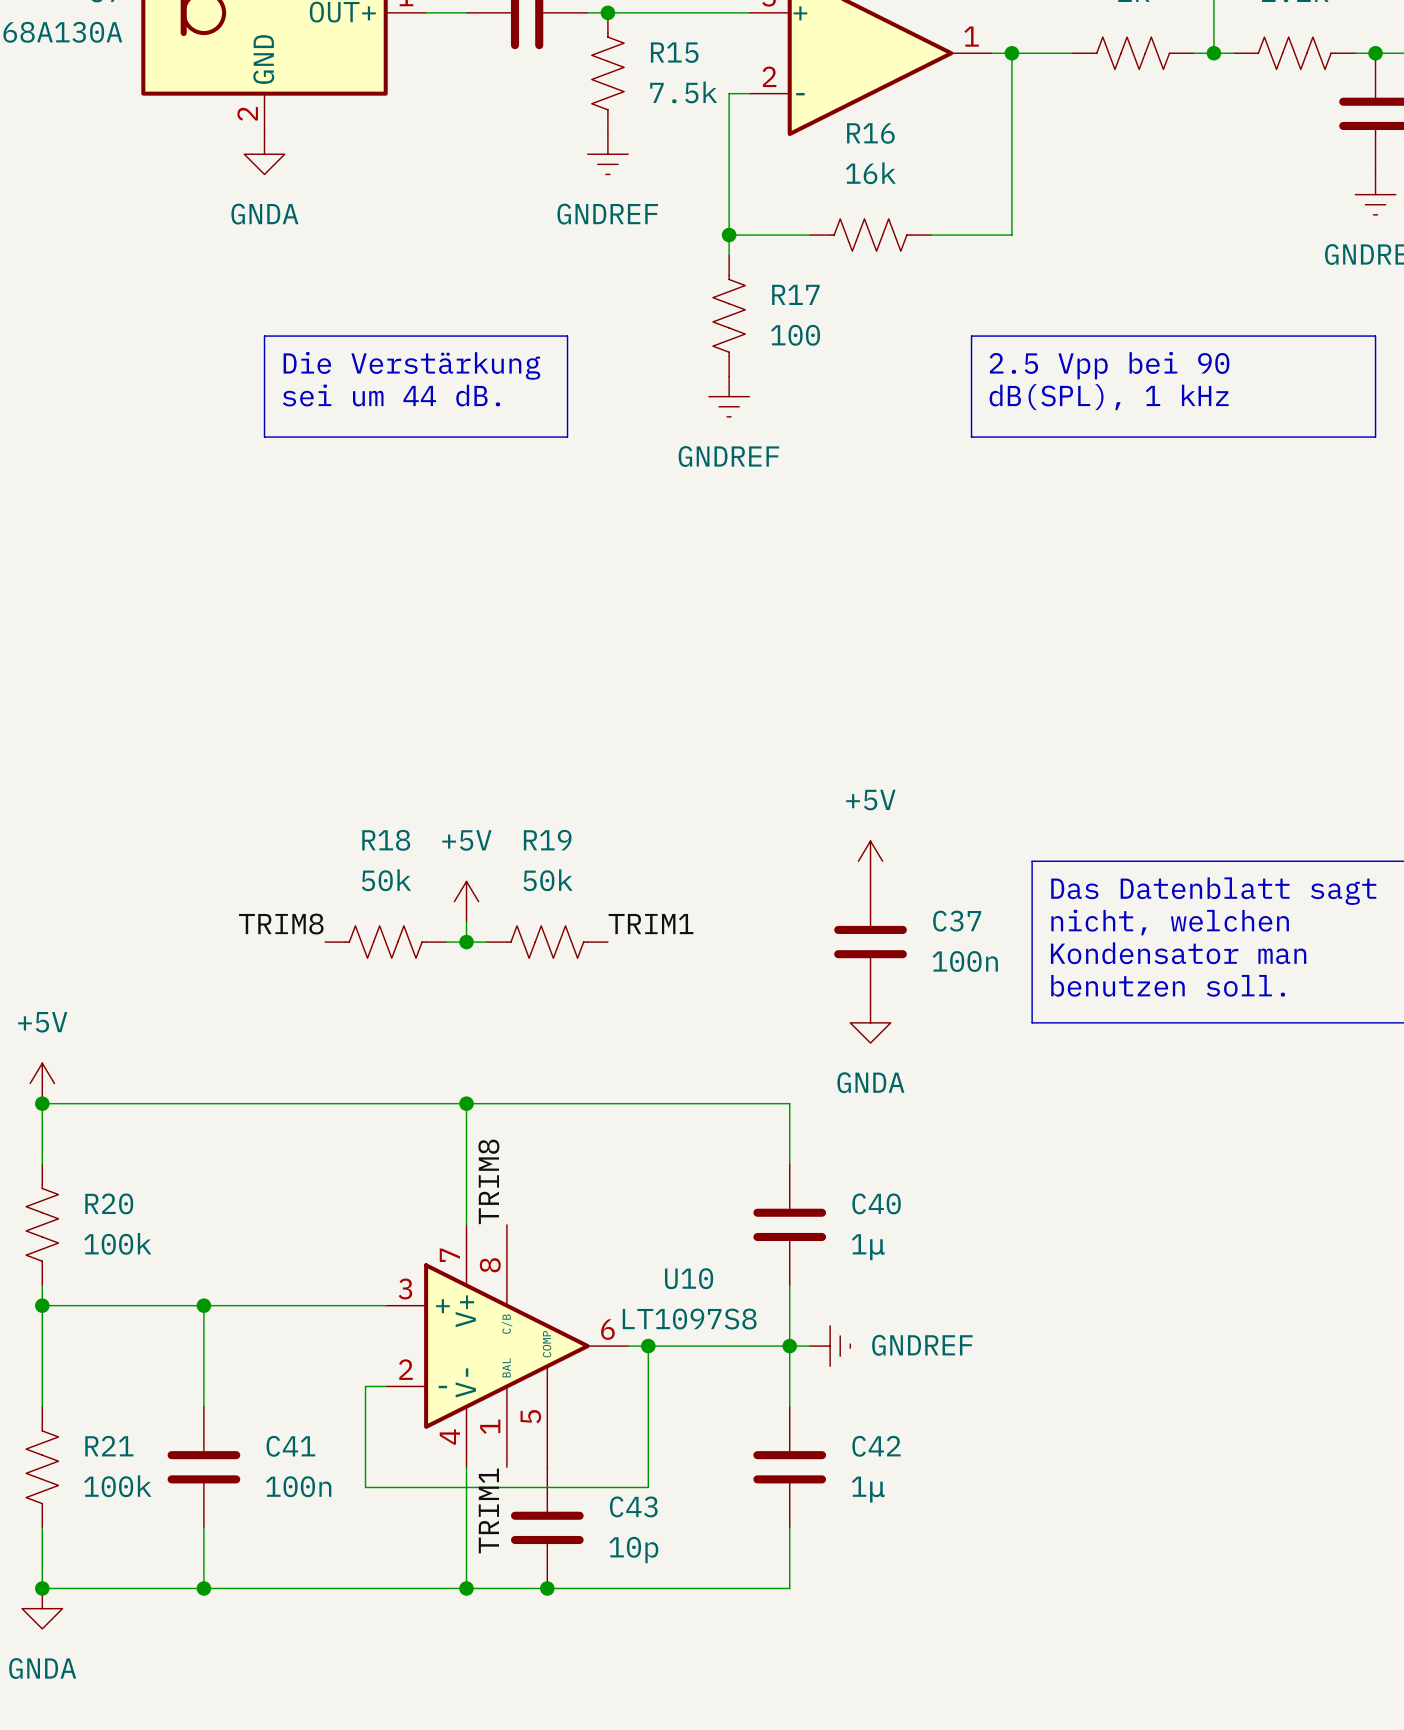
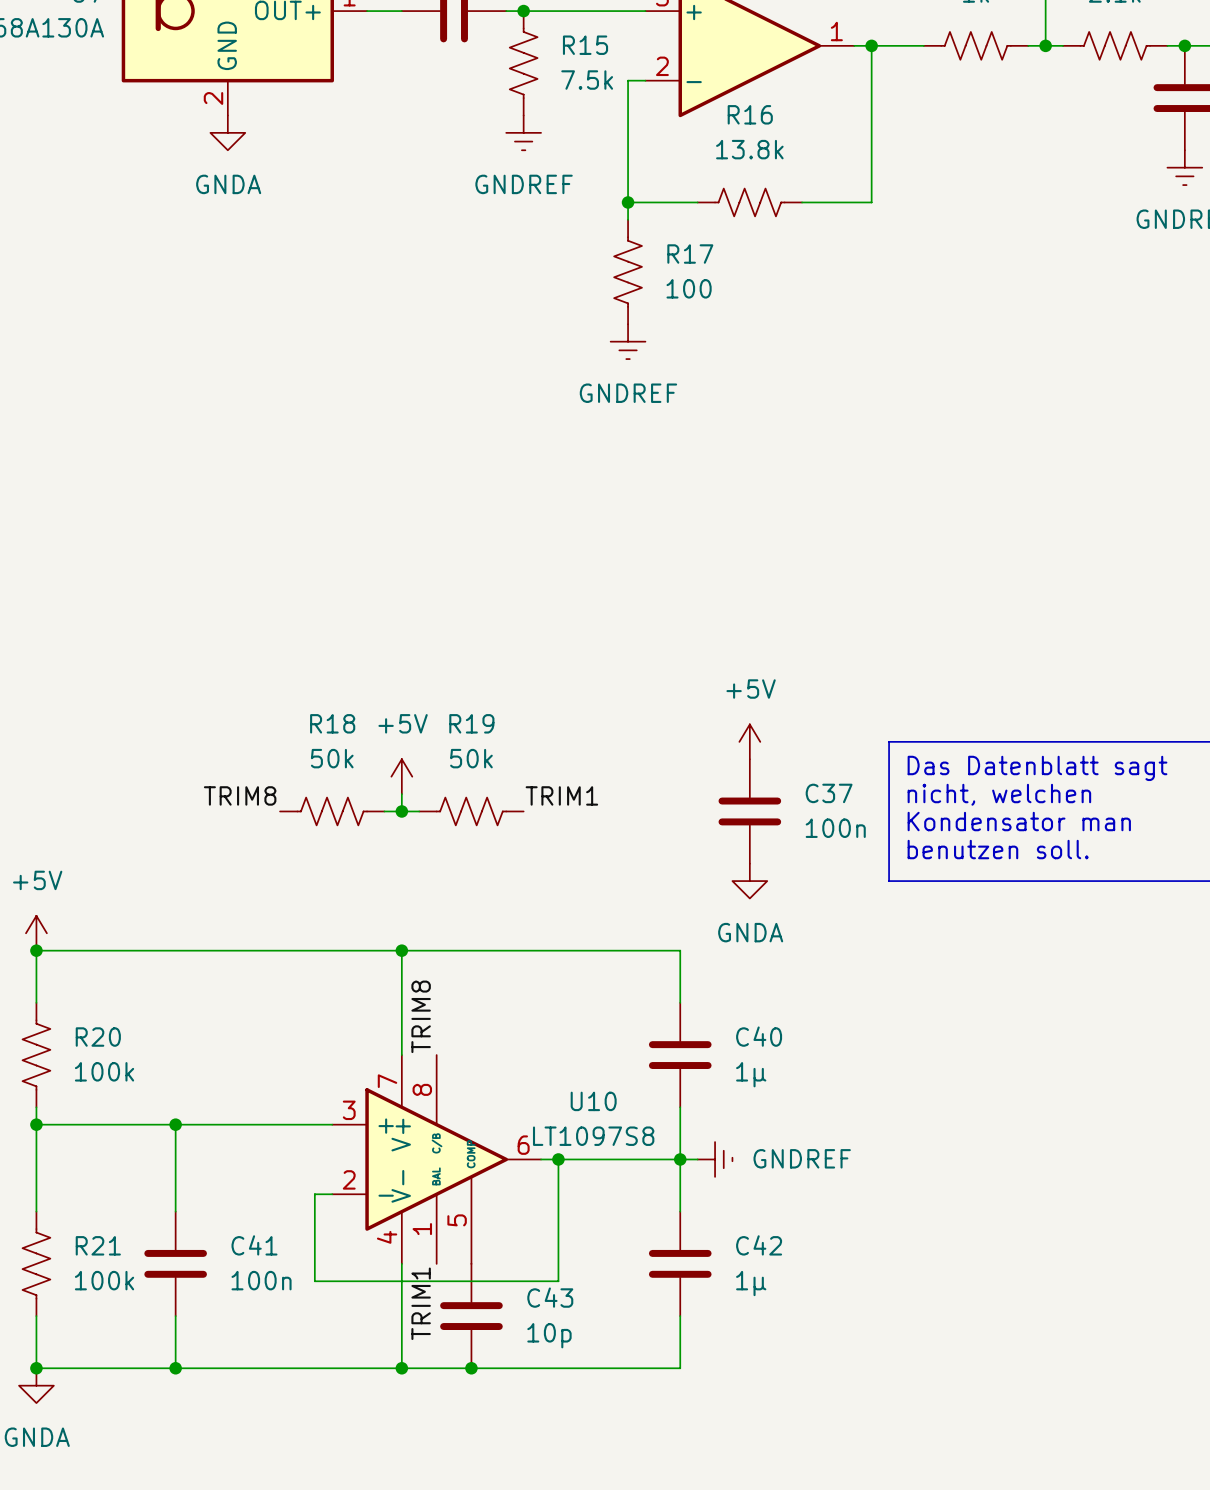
R16 value: 16k (870, 173) -> 13.8k (749, 149)
line: (264, 336) (567, 336) (567, 437) (264, 437) (264, 336) -> none
line: (971, 336) (1375, 336) (1375, 437) (971, 437) (971, 336) -> none
text: Die Verstärkung (411, 365) -> none
text: 2.5 Vpp bei 90 (1109, 365) -> none
text: sei um 44 dB. (391, 395) -> none
text: dB(SPL), 1 kHz (1109, 397) -> none

